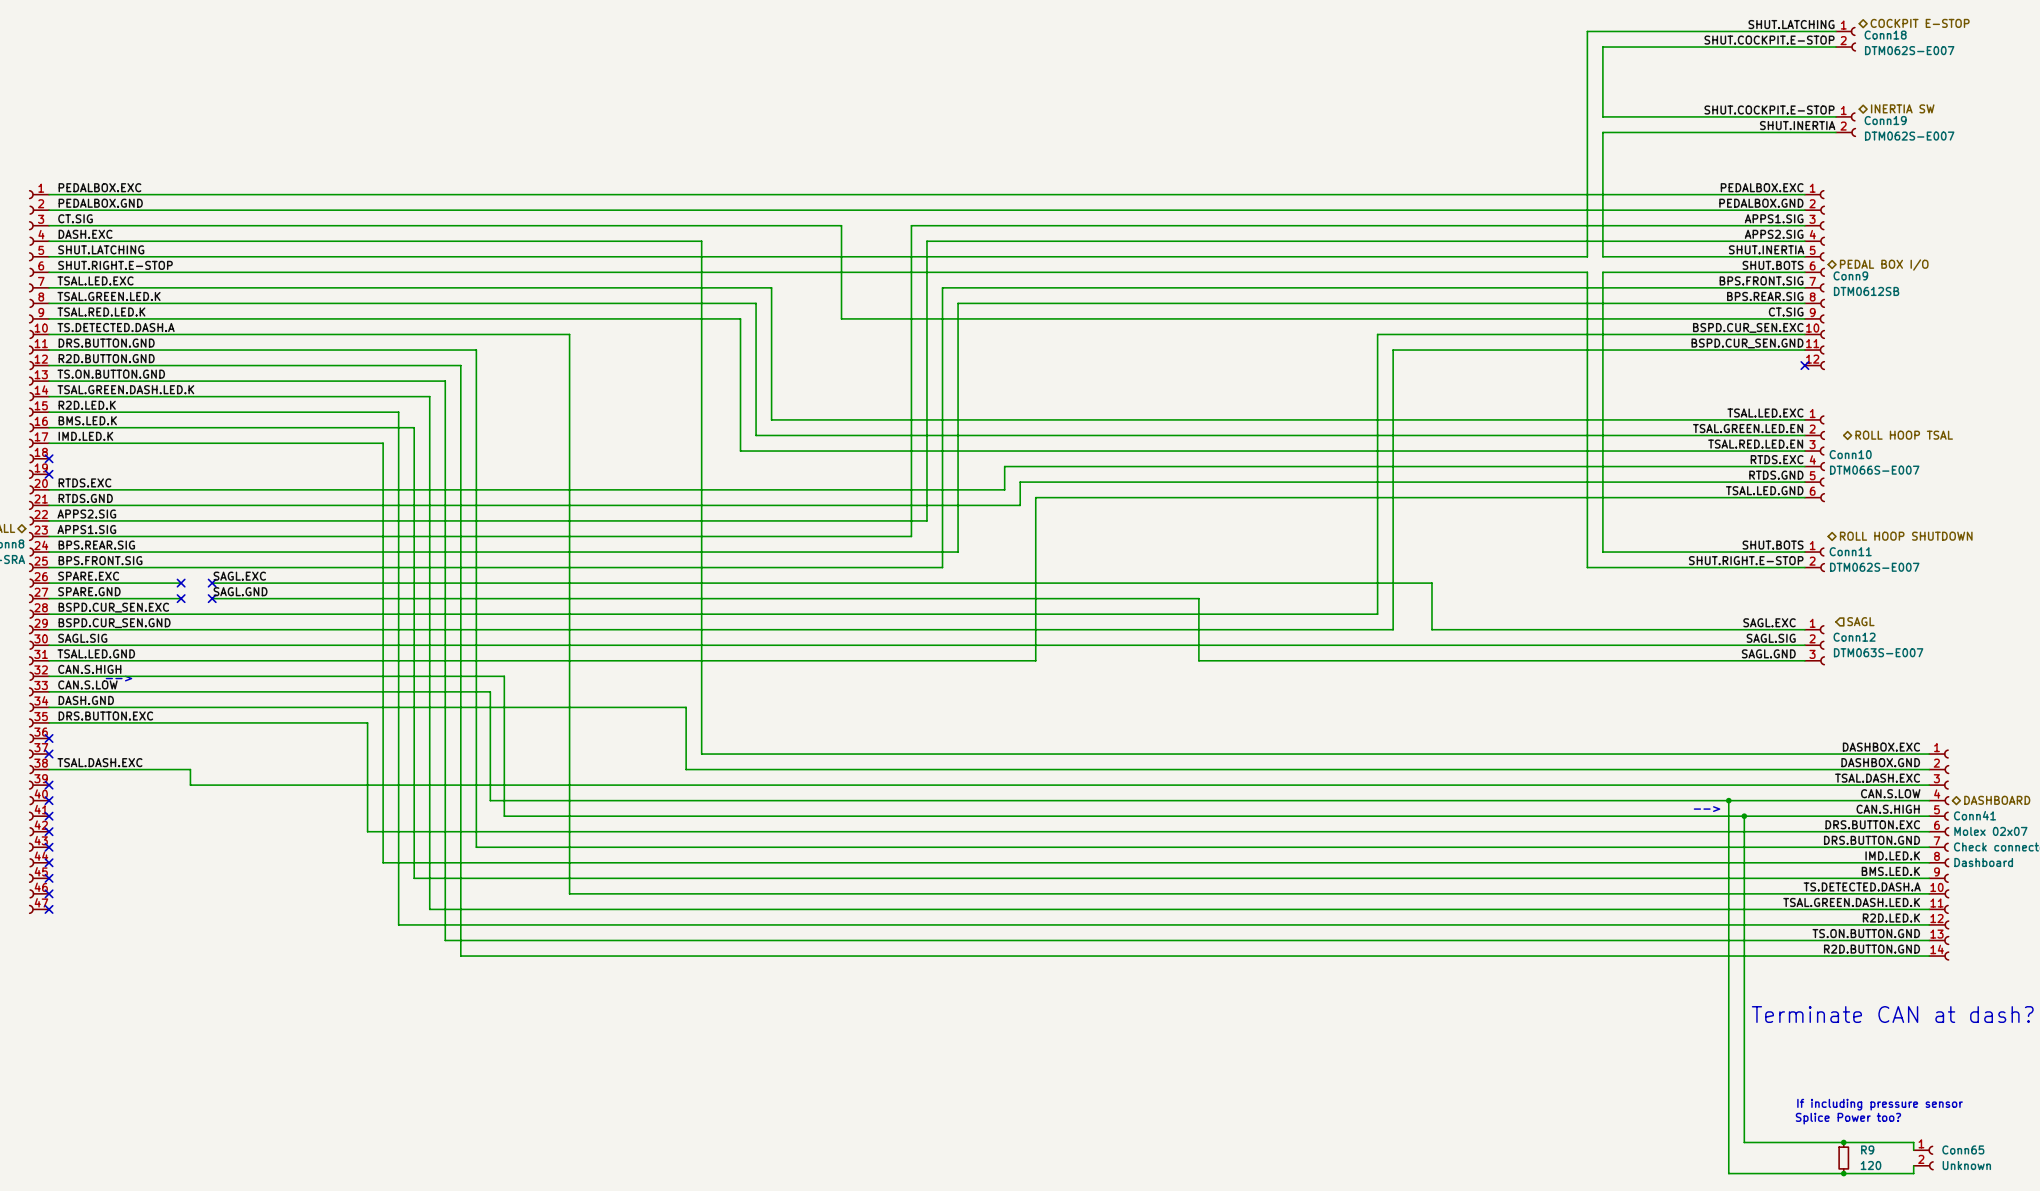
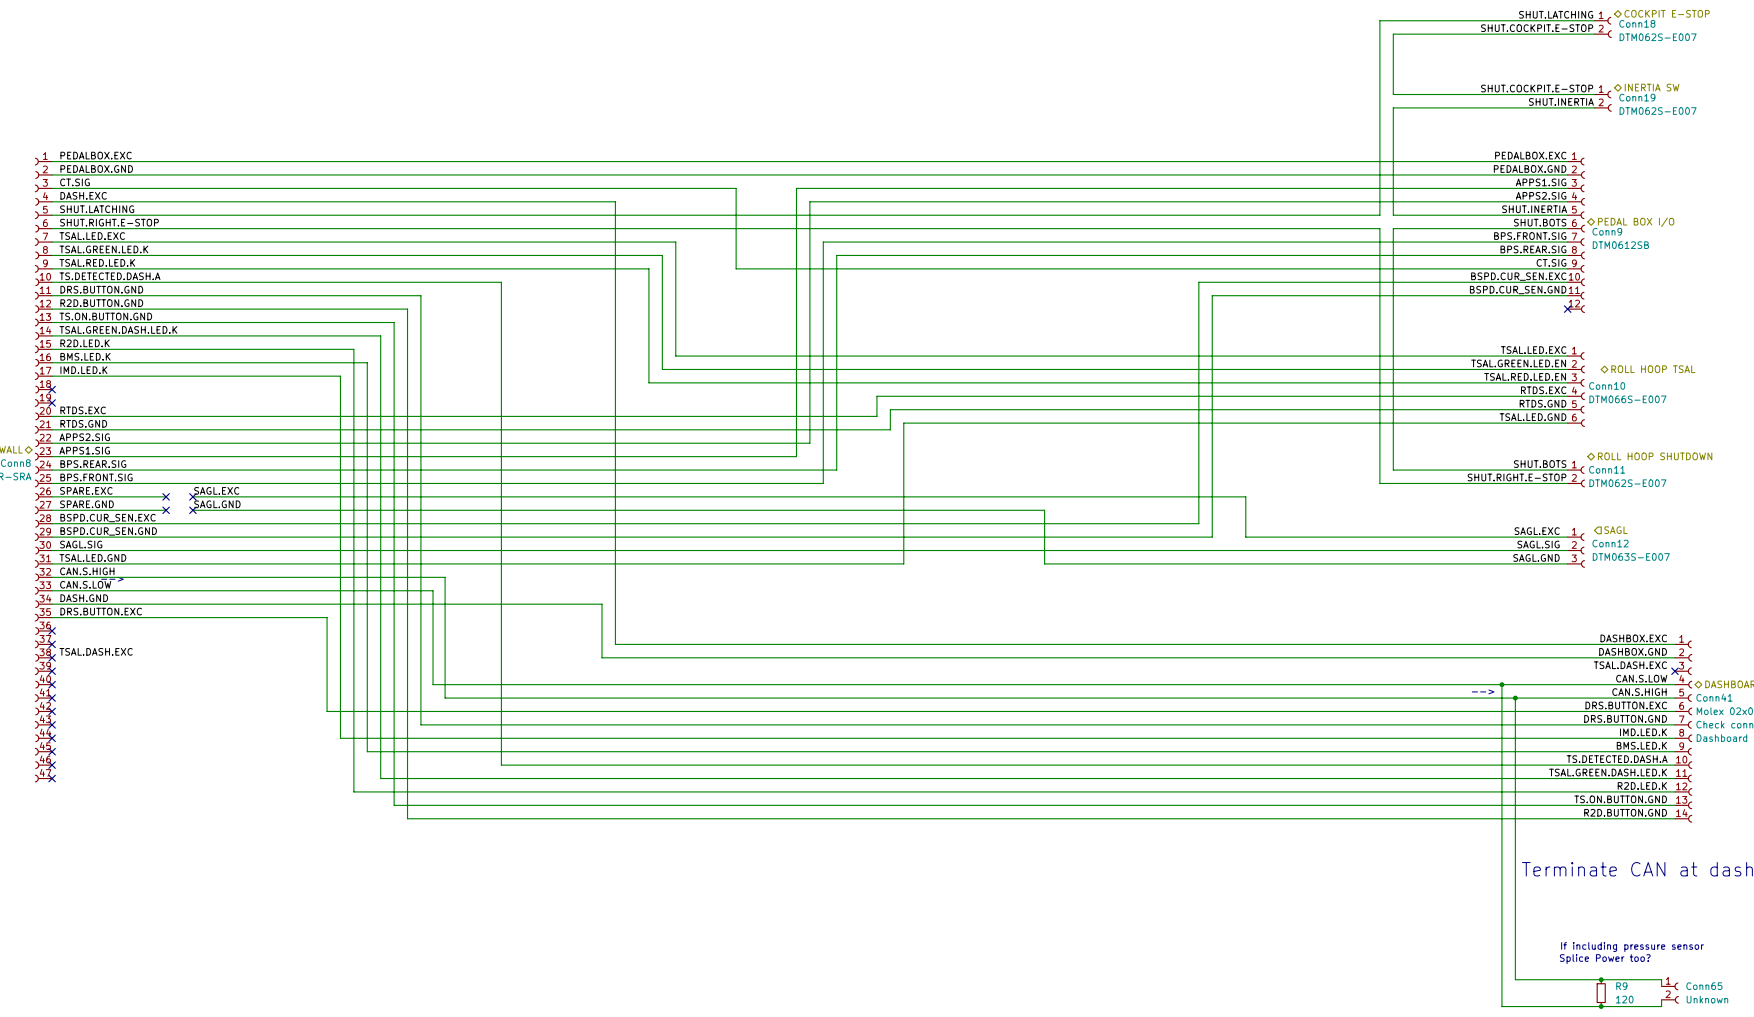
wire: (49, 769) (190, 769) (190, 785) (1929, 785) -> none
no-connect mark: none -> (52, 657)
no-connect mark: none -> (1674, 671)

